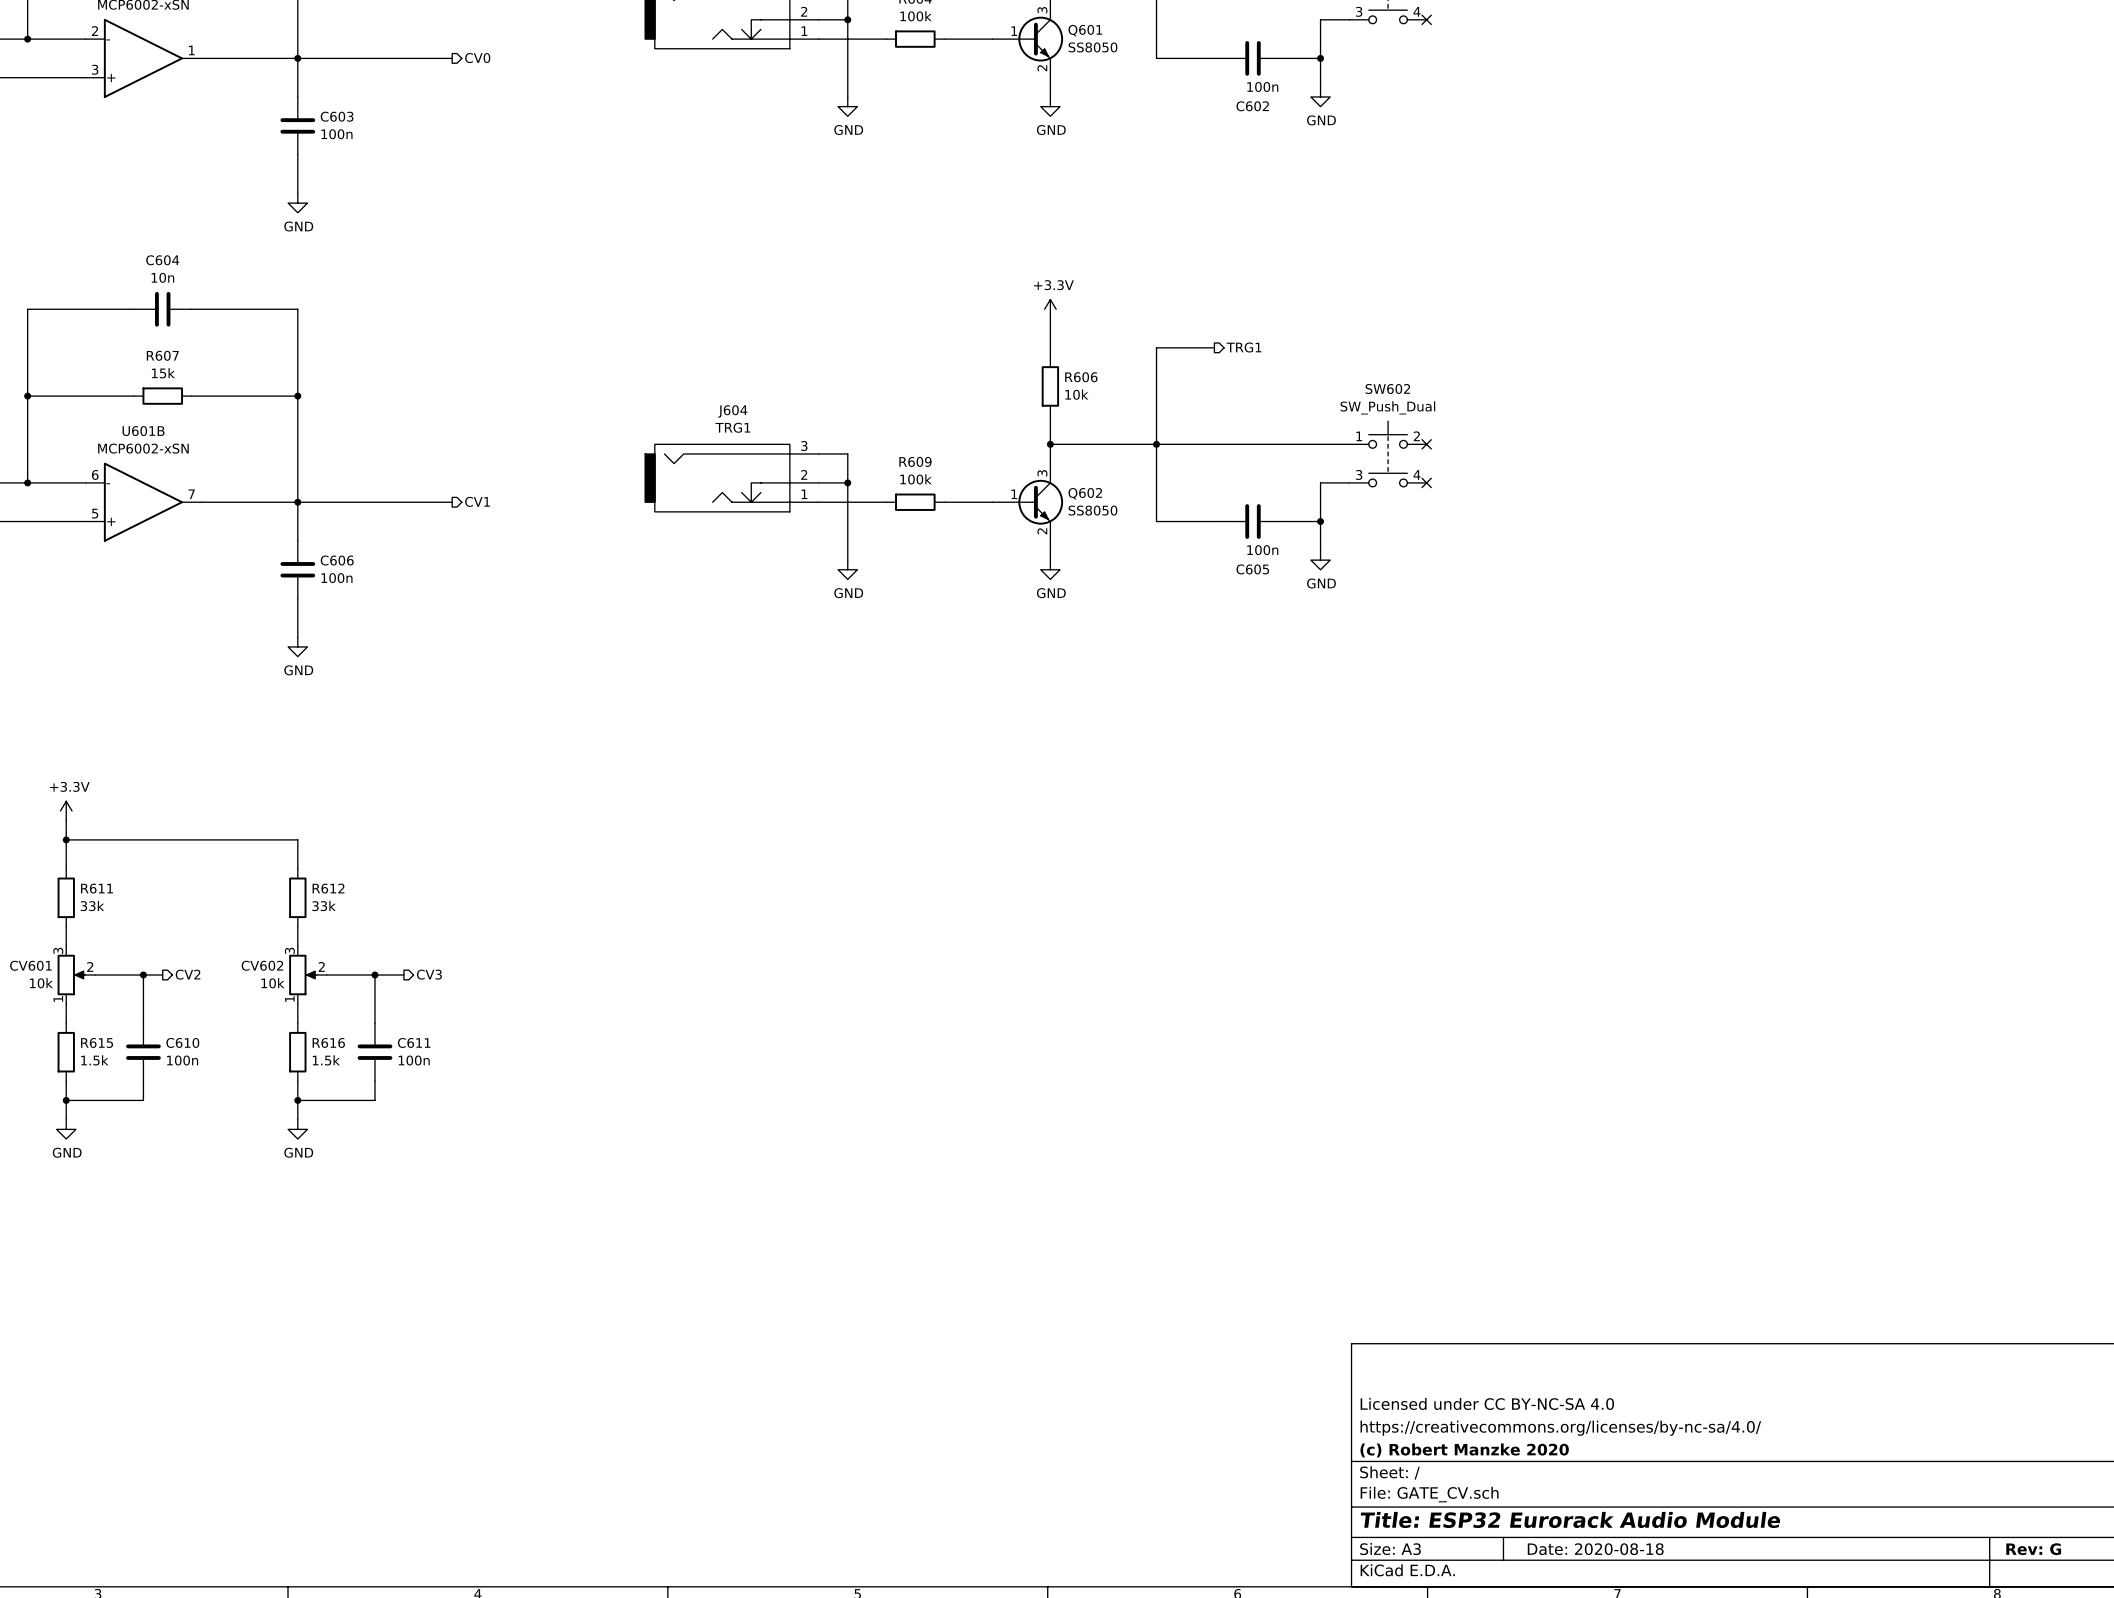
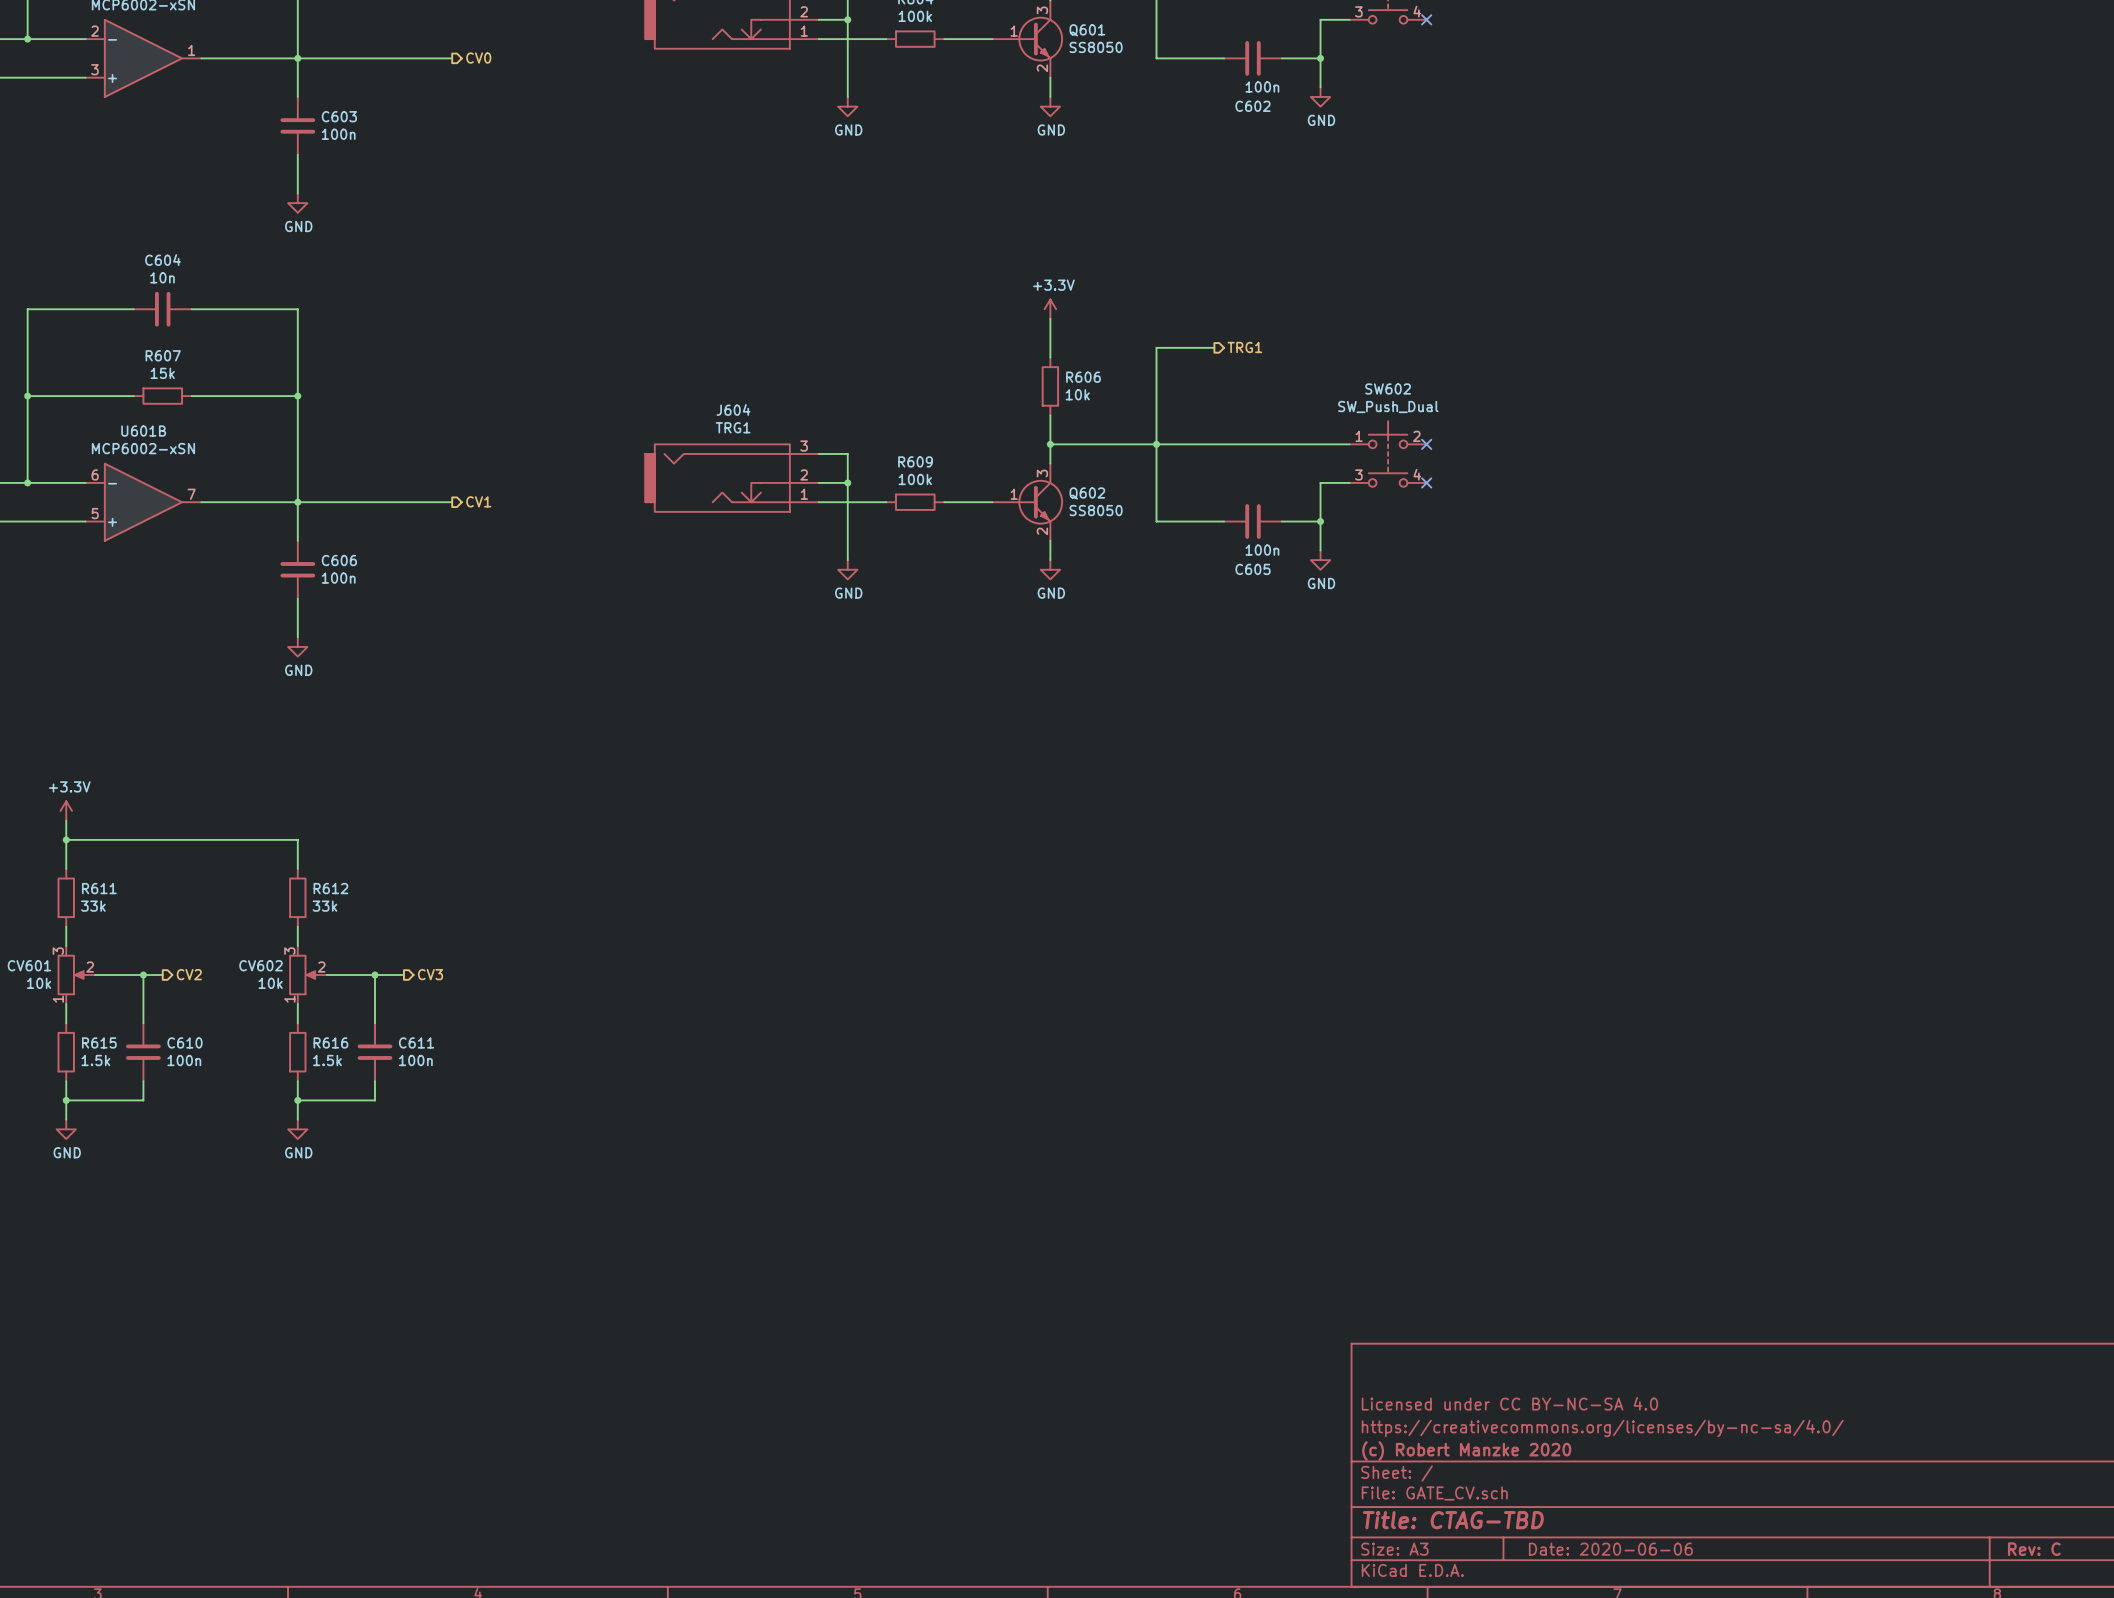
title block: Title: ESP32 Eurorack Audio Module (1570, 1519) -> Title: CTAG-TBD (1453, 1520)
title block: Date: 2020-08-18 (1595, 1549) -> Date: 2020-06-06 (1610, 1549)
title block: Rev: G (2033, 1549) -> Rev: C (2034, 1549)

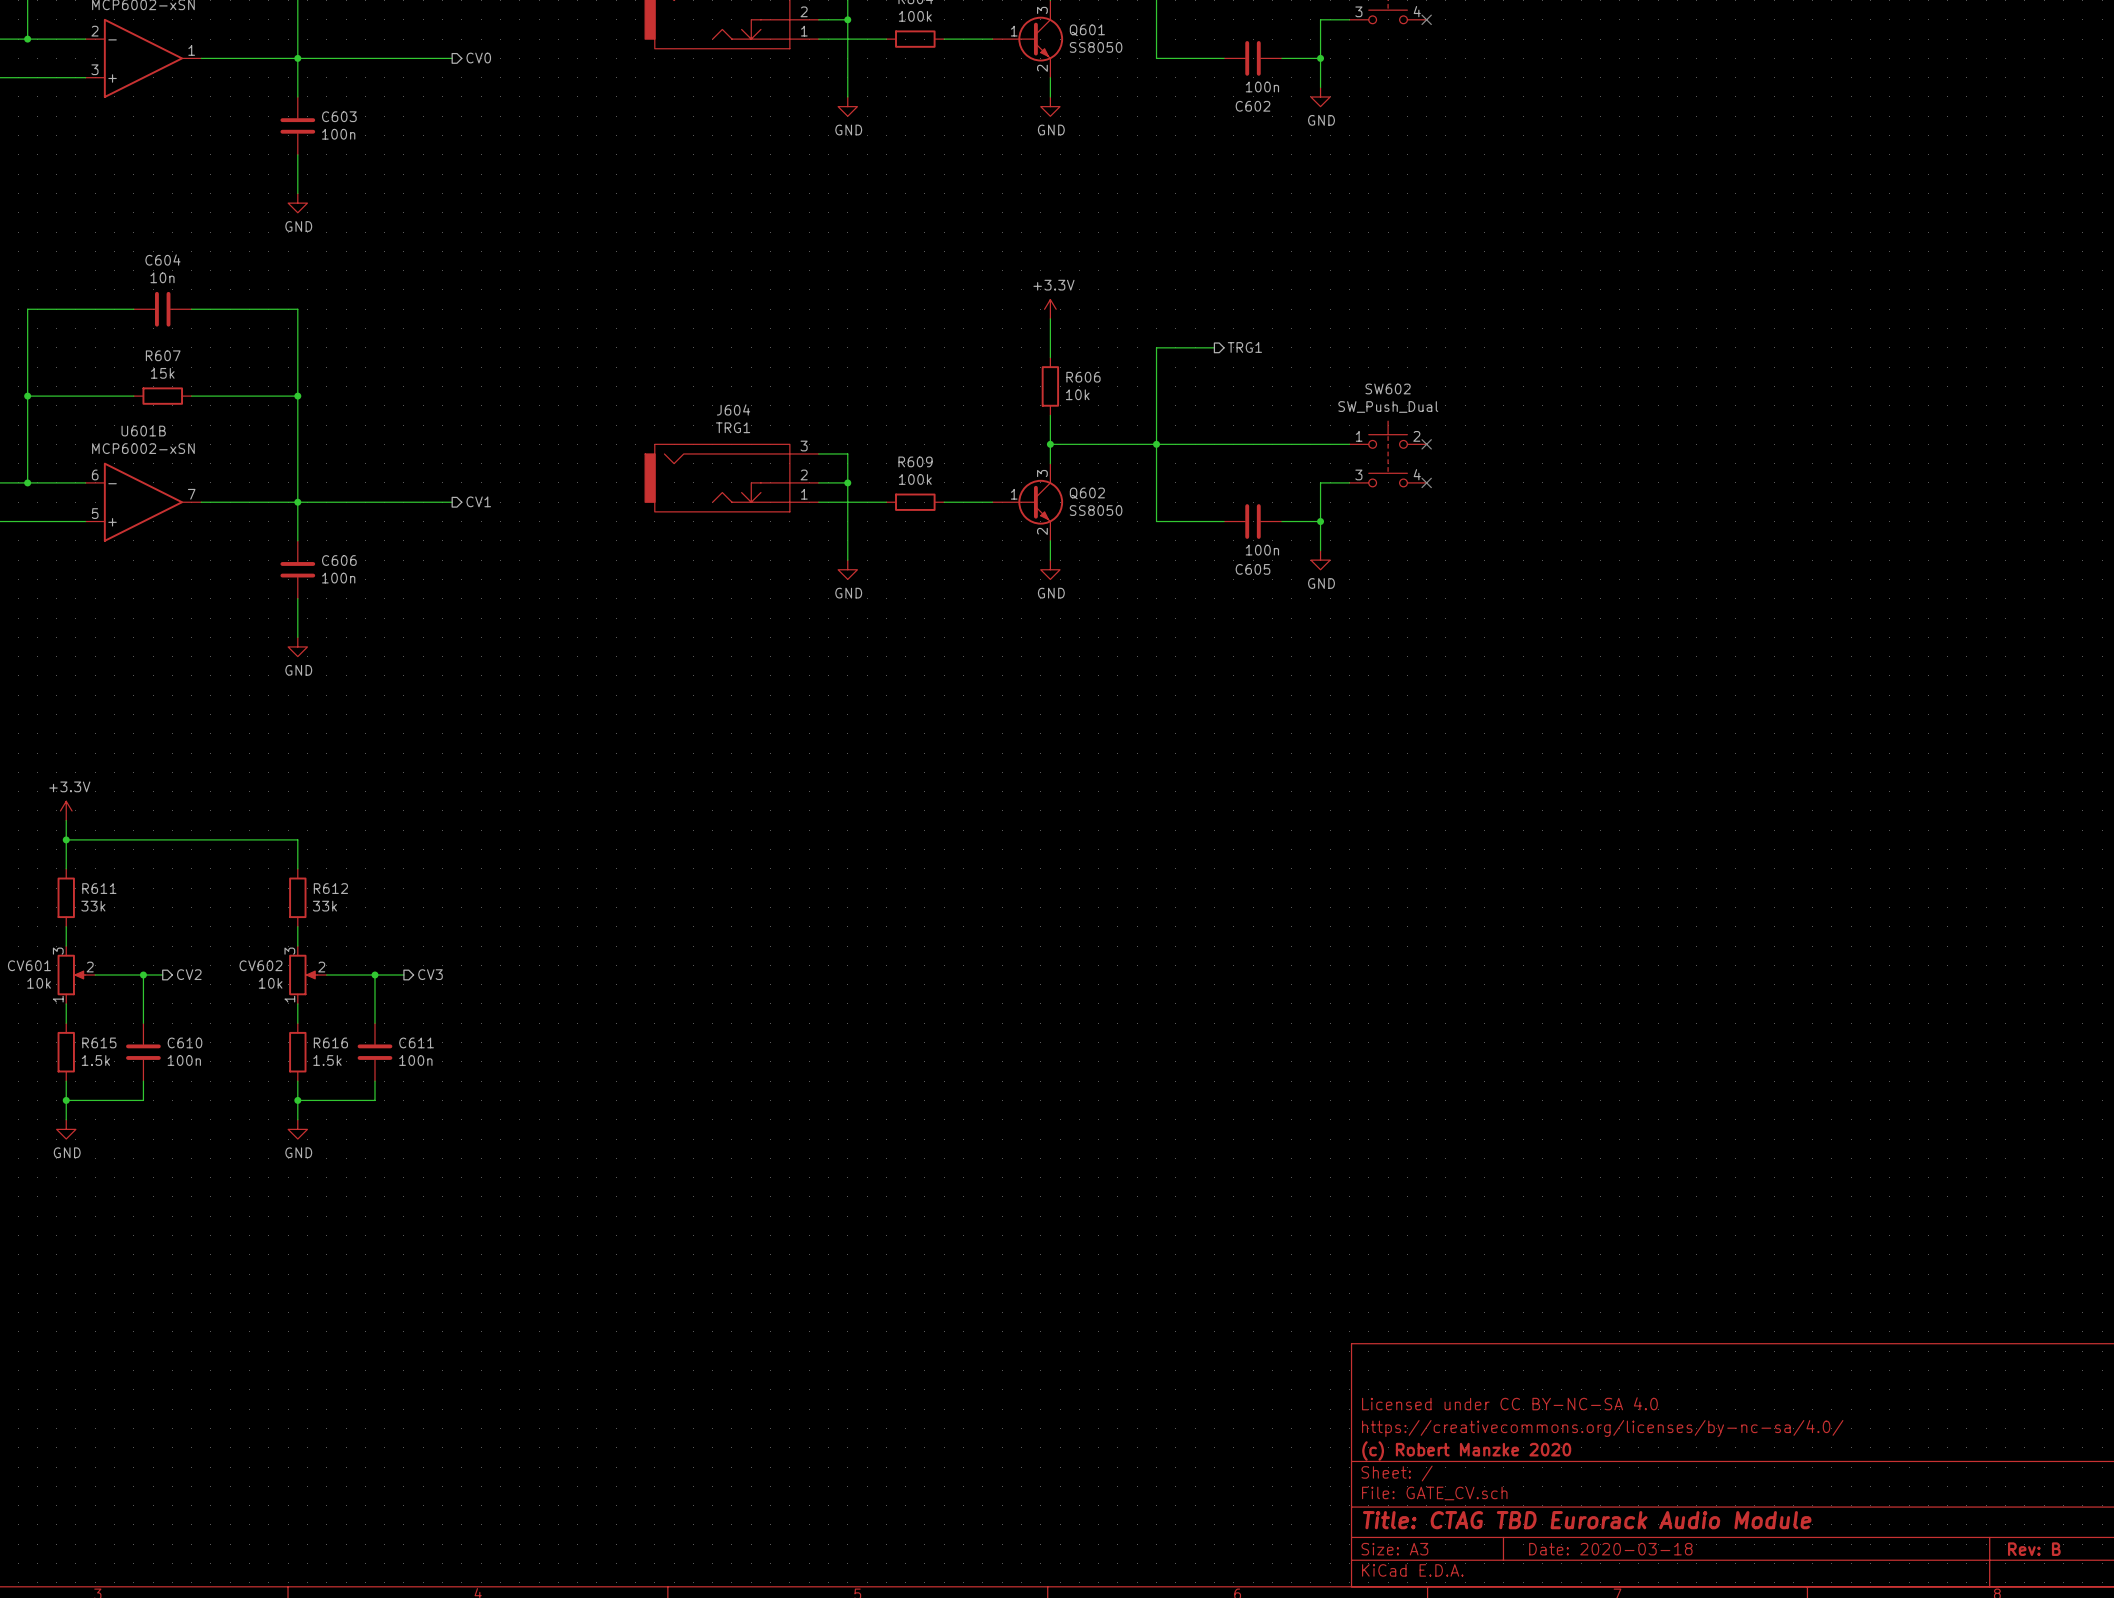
title block: Title: CTAG-TBD (1453, 1520) -> Title: CTAG TBD Eurorack Audio Module (1587, 1520)
title block: Date: 2020-06-06 (1610, 1549) -> Date: 2020-03-18 (1610, 1549)
title block: Rev: C (2034, 1549) -> Rev: B (2034, 1549)

